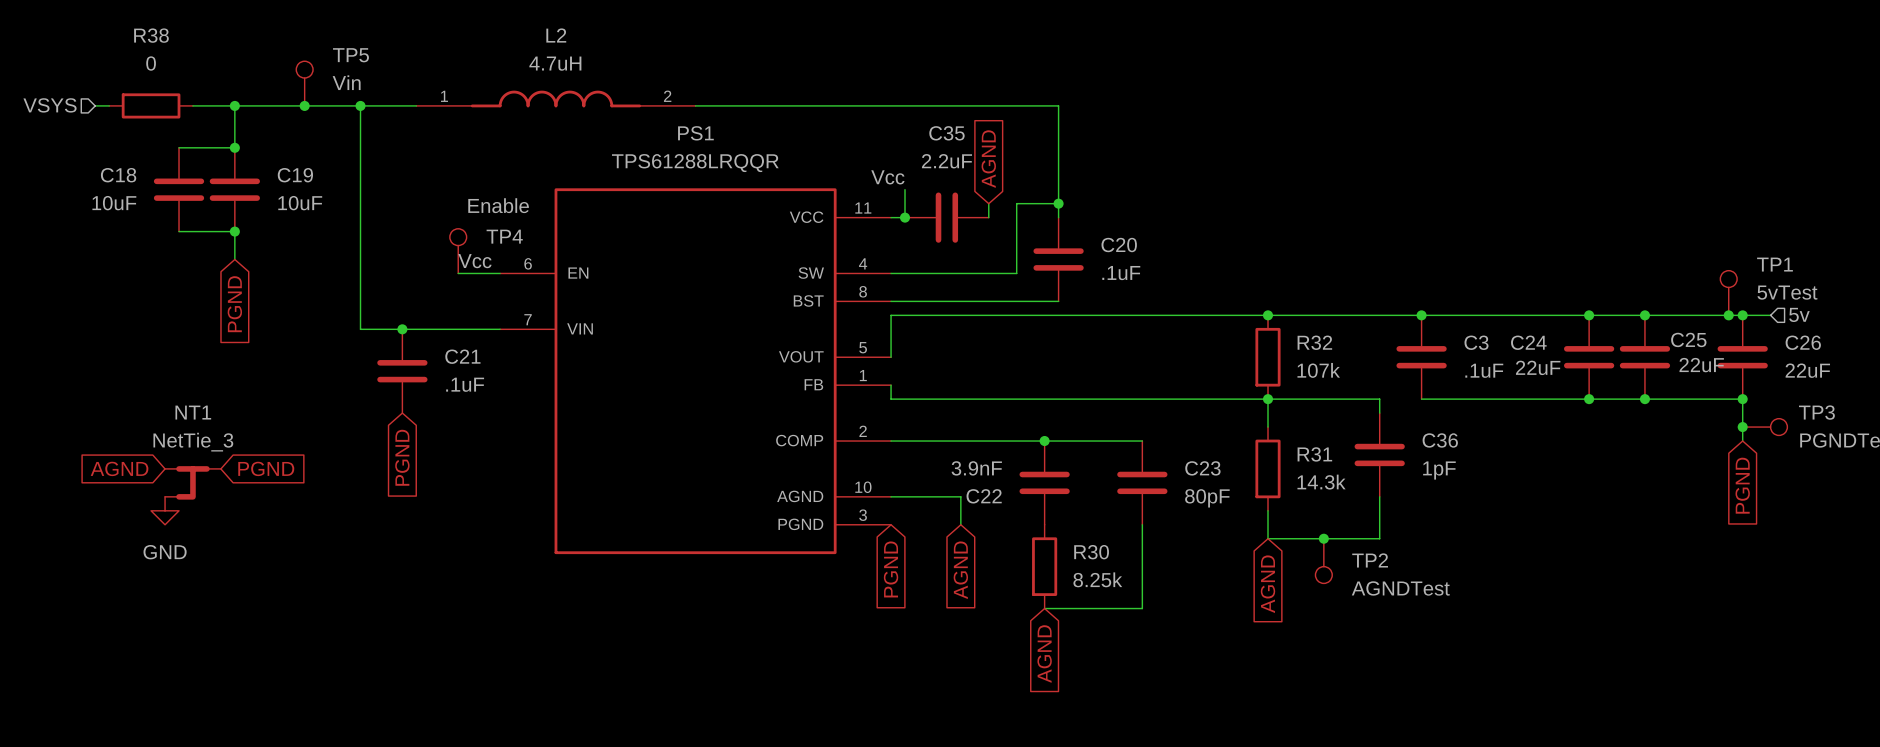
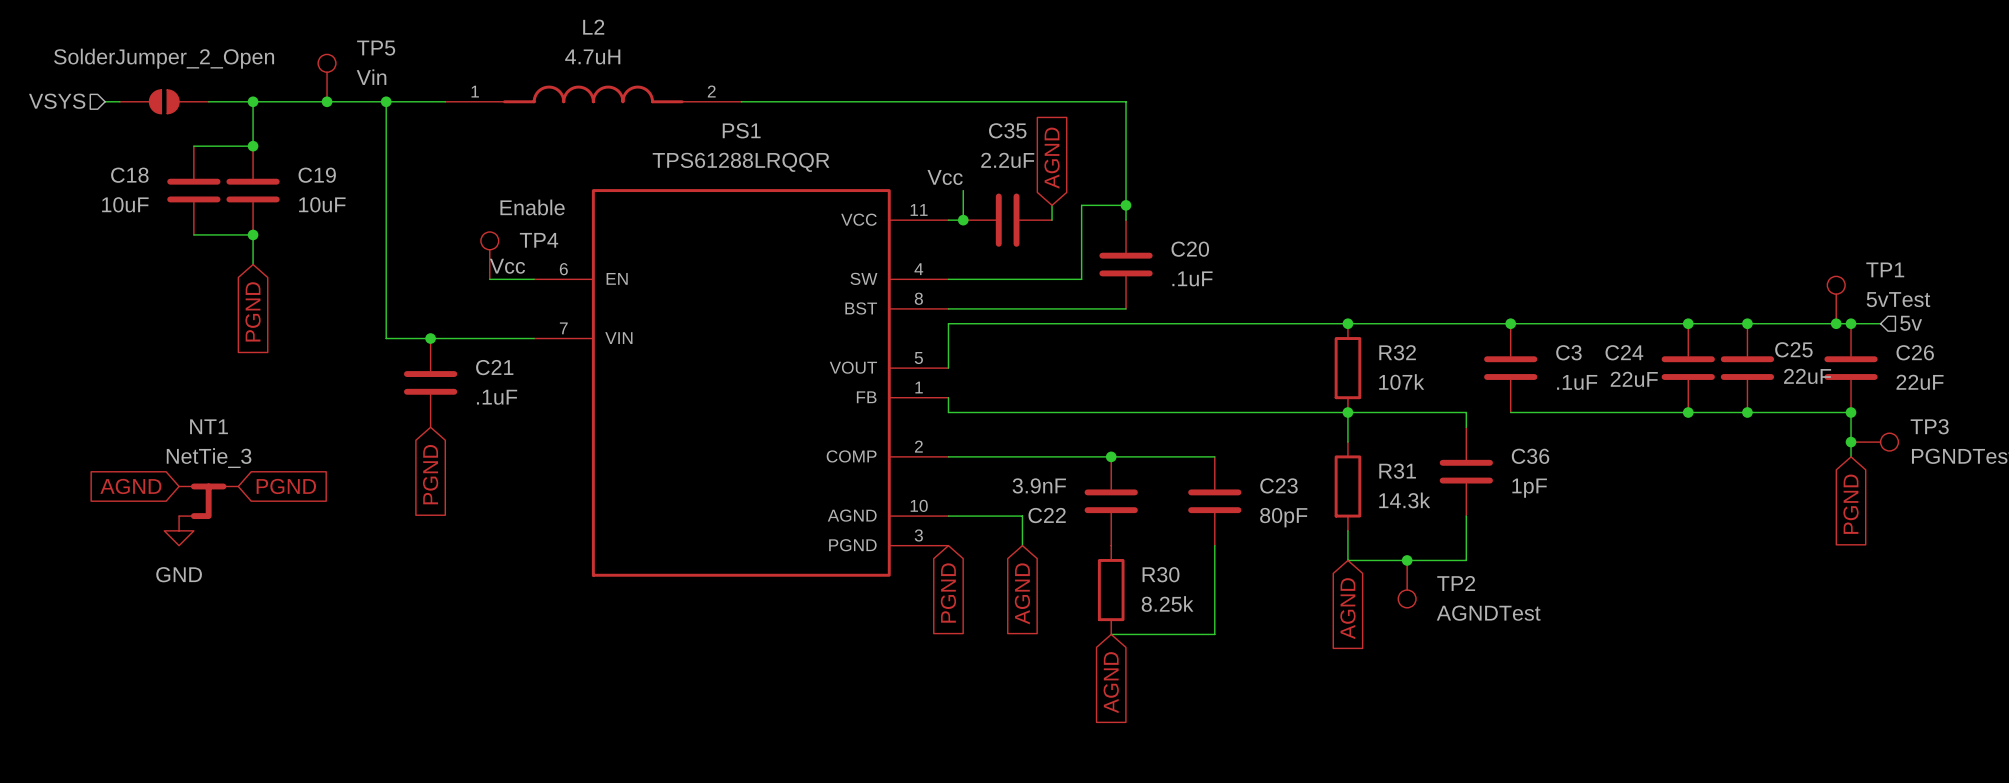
R38: 0 (151, 105) -> none
part: none -> SolderJumper_2_Open (164, 101)

